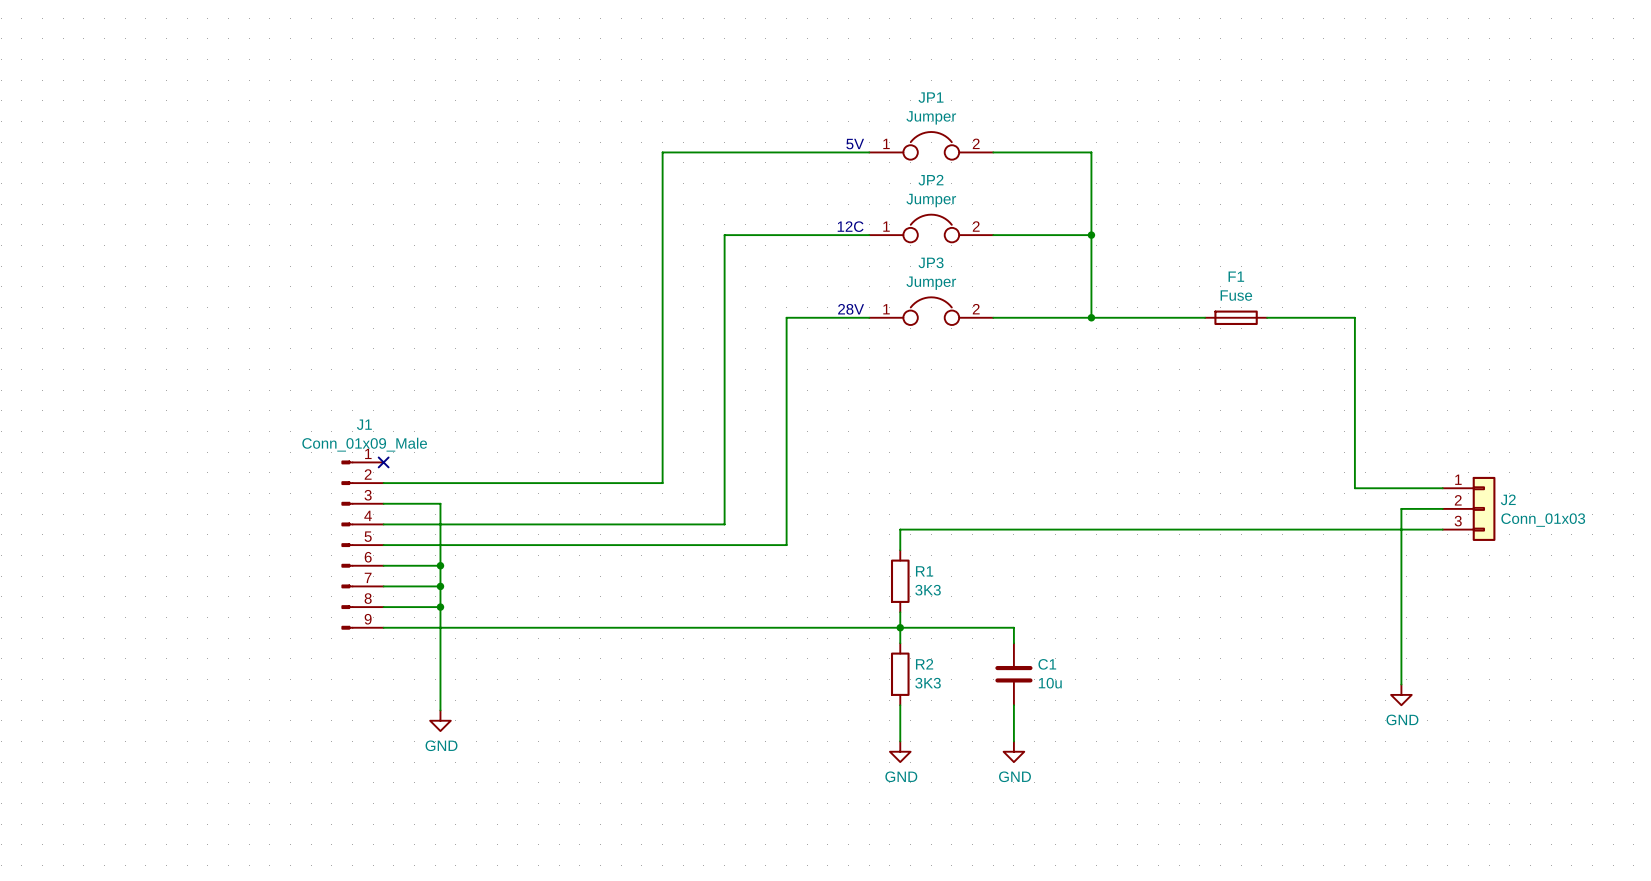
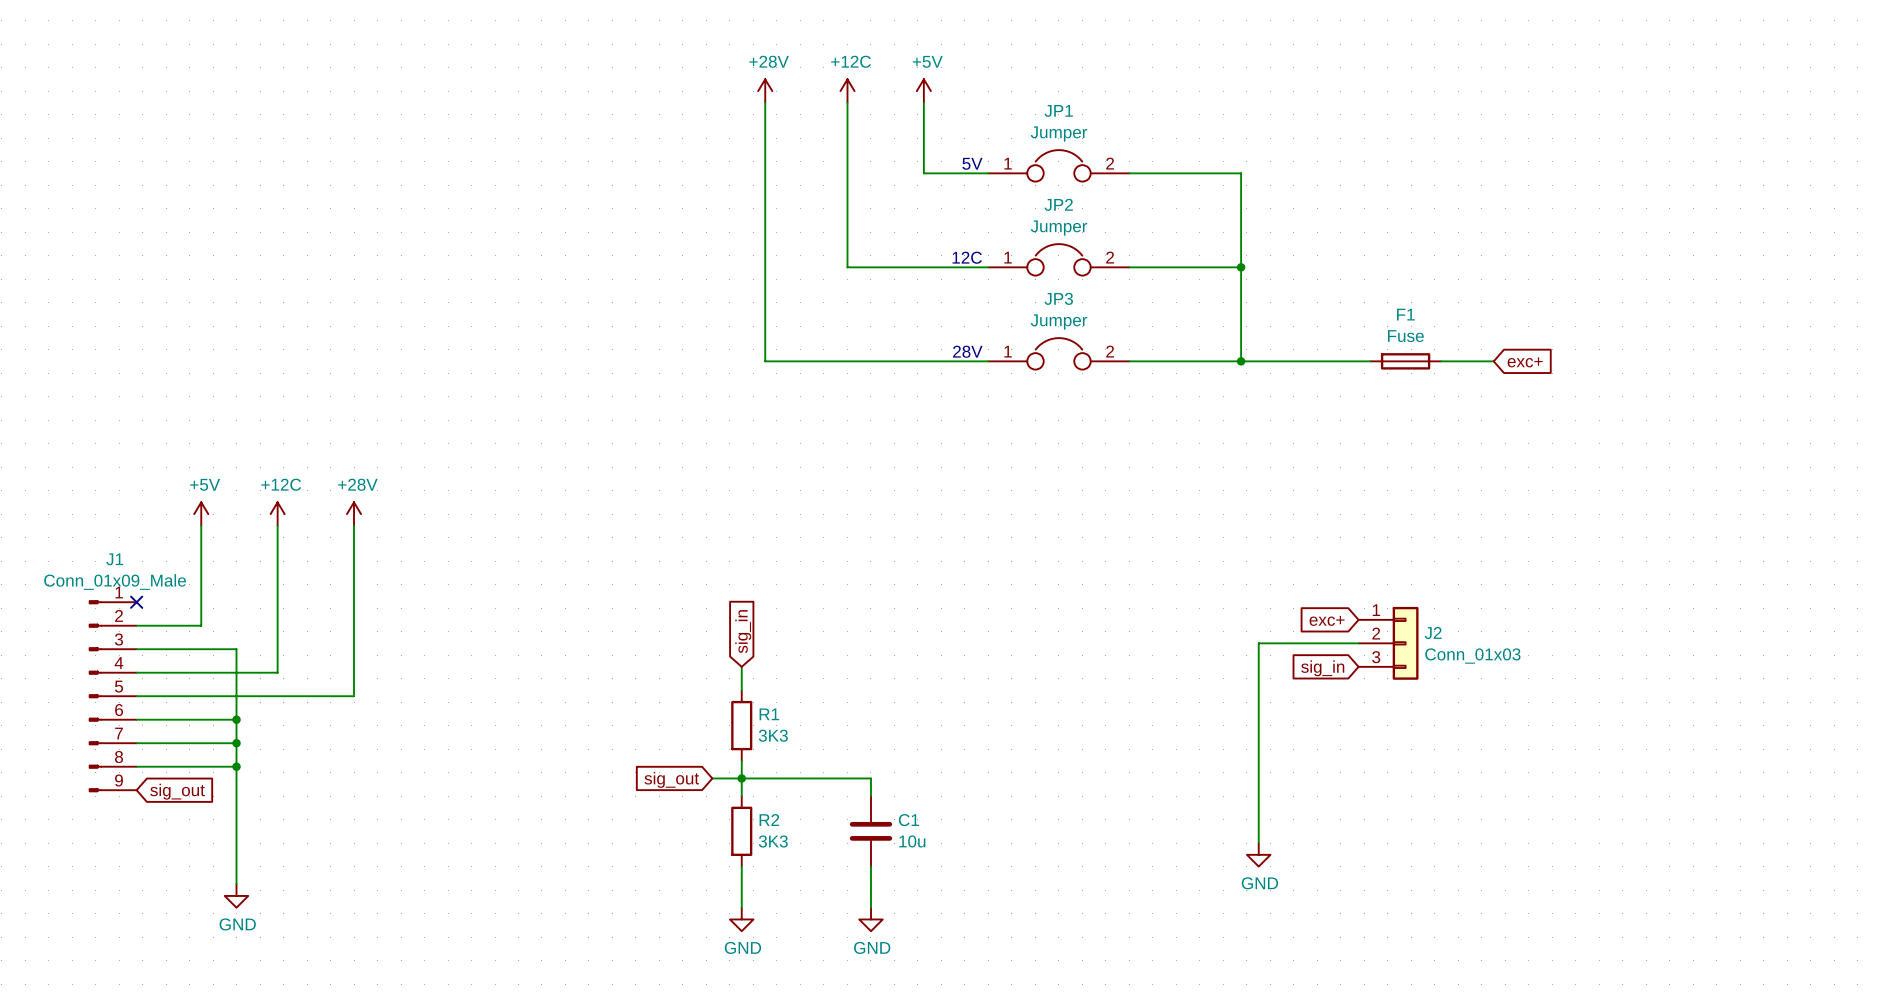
power symbol: none -> +28V (765, 91)
power symbol: none -> +12C (847, 91)
power symbol: none -> +5V (923, 91)
wire: (812, 152) (662, 152) (662, 483) (383, 483) -> (923, 173) (923, 102)
wire: (745, 235) (724, 235) (724, 524) (383, 524) -> (847, 267) (847, 102)
wire: (786, 317) (786, 545) (383, 545) -> (894, 361) (765, 361) (765, 102)
wire: (1313, 317) (1354, 317) (1354, 488) (1442, 488) -> none
global label: none -> exc+ (1525, 362)
power symbol: none -> +5V (201, 514)
power symbol: none -> +12C (277, 514)
power symbol: none -> +28V (354, 514)
wire: none -> (201, 525) (201, 625) (136, 625)
wire: none -> (277, 525) (277, 672) (136, 672)
wire: none -> (354, 525) (354, 696) (136, 696)
no-connect mark: (383, 462) -> none
wire: (383, 503) (440, 503) (440, 710) -> none
wire: (1442, 508) (1401, 508) (1401, 684) -> none
J2 position: (1469, 508) -> (1388, 643)
no-connect mark: none -> (136, 602)
wire: (1442, 529) (900, 529) (900, 550) -> none
J1 position: (362, 545) -> (112, 696)
global label: none -> exc+ (1327, 620)
global label: none -> sig_in (743, 631)
wire: (383, 565) (440, 565) -> none
junction: (440, 565) -> none
wire: none -> (1358, 643) (1258, 643) (1258, 843)
wire: none -> (136, 649) (236, 649) (236, 884)
R1 position: (900, 581) -> (741, 725)
wire: (383, 586) (440, 586) -> none
junction: (440, 586) -> none
wire: none -> (741, 666) (741, 690)
global label: none -> sig_in (1322, 668)
wire: (383, 607) (440, 607) -> none
junction: (440, 607) -> none
wire: (900, 612) (900, 643) -> none
wire: (383, 627) (1013, 627) (1013, 643) -> none
junction: (900, 627) -> none
wire: none -> (136, 719) (236, 719)
junction: none -> (236, 719)
wire: none -> (136, 743) (236, 743)
junction: none -> (236, 743)
wire: none -> (741, 760) (741, 796)
wire: none -> (136, 766) (236, 766)
junction: none -> (236, 766)
R2 position: (900, 674) -> (741, 831)
C1 position: (1013, 674) -> (870, 831)
wire: none -> (712, 778) (870, 778) (870, 796)
junction: none -> (741, 778)
global label: none -> sig_out (671, 779)
power symbol: GND (1401, 694) -> none
global label: none -> sig_out (177, 791)
wire: (900, 705) (900, 741) -> (870, 866) (870, 907)
wire: (1013, 705) (1013, 741) -> none
power symbol: GND (440, 720) -> none
power symbol: GND (900, 751) -> none
power symbol position: GND (1013, 751) -> GND (1258, 854)
wire: none -> (741, 866) (741, 907)
power symbol: none -> GND (236, 895)
power symbol: none -> GND (741, 919)
power symbol: none -> GND (870, 919)

